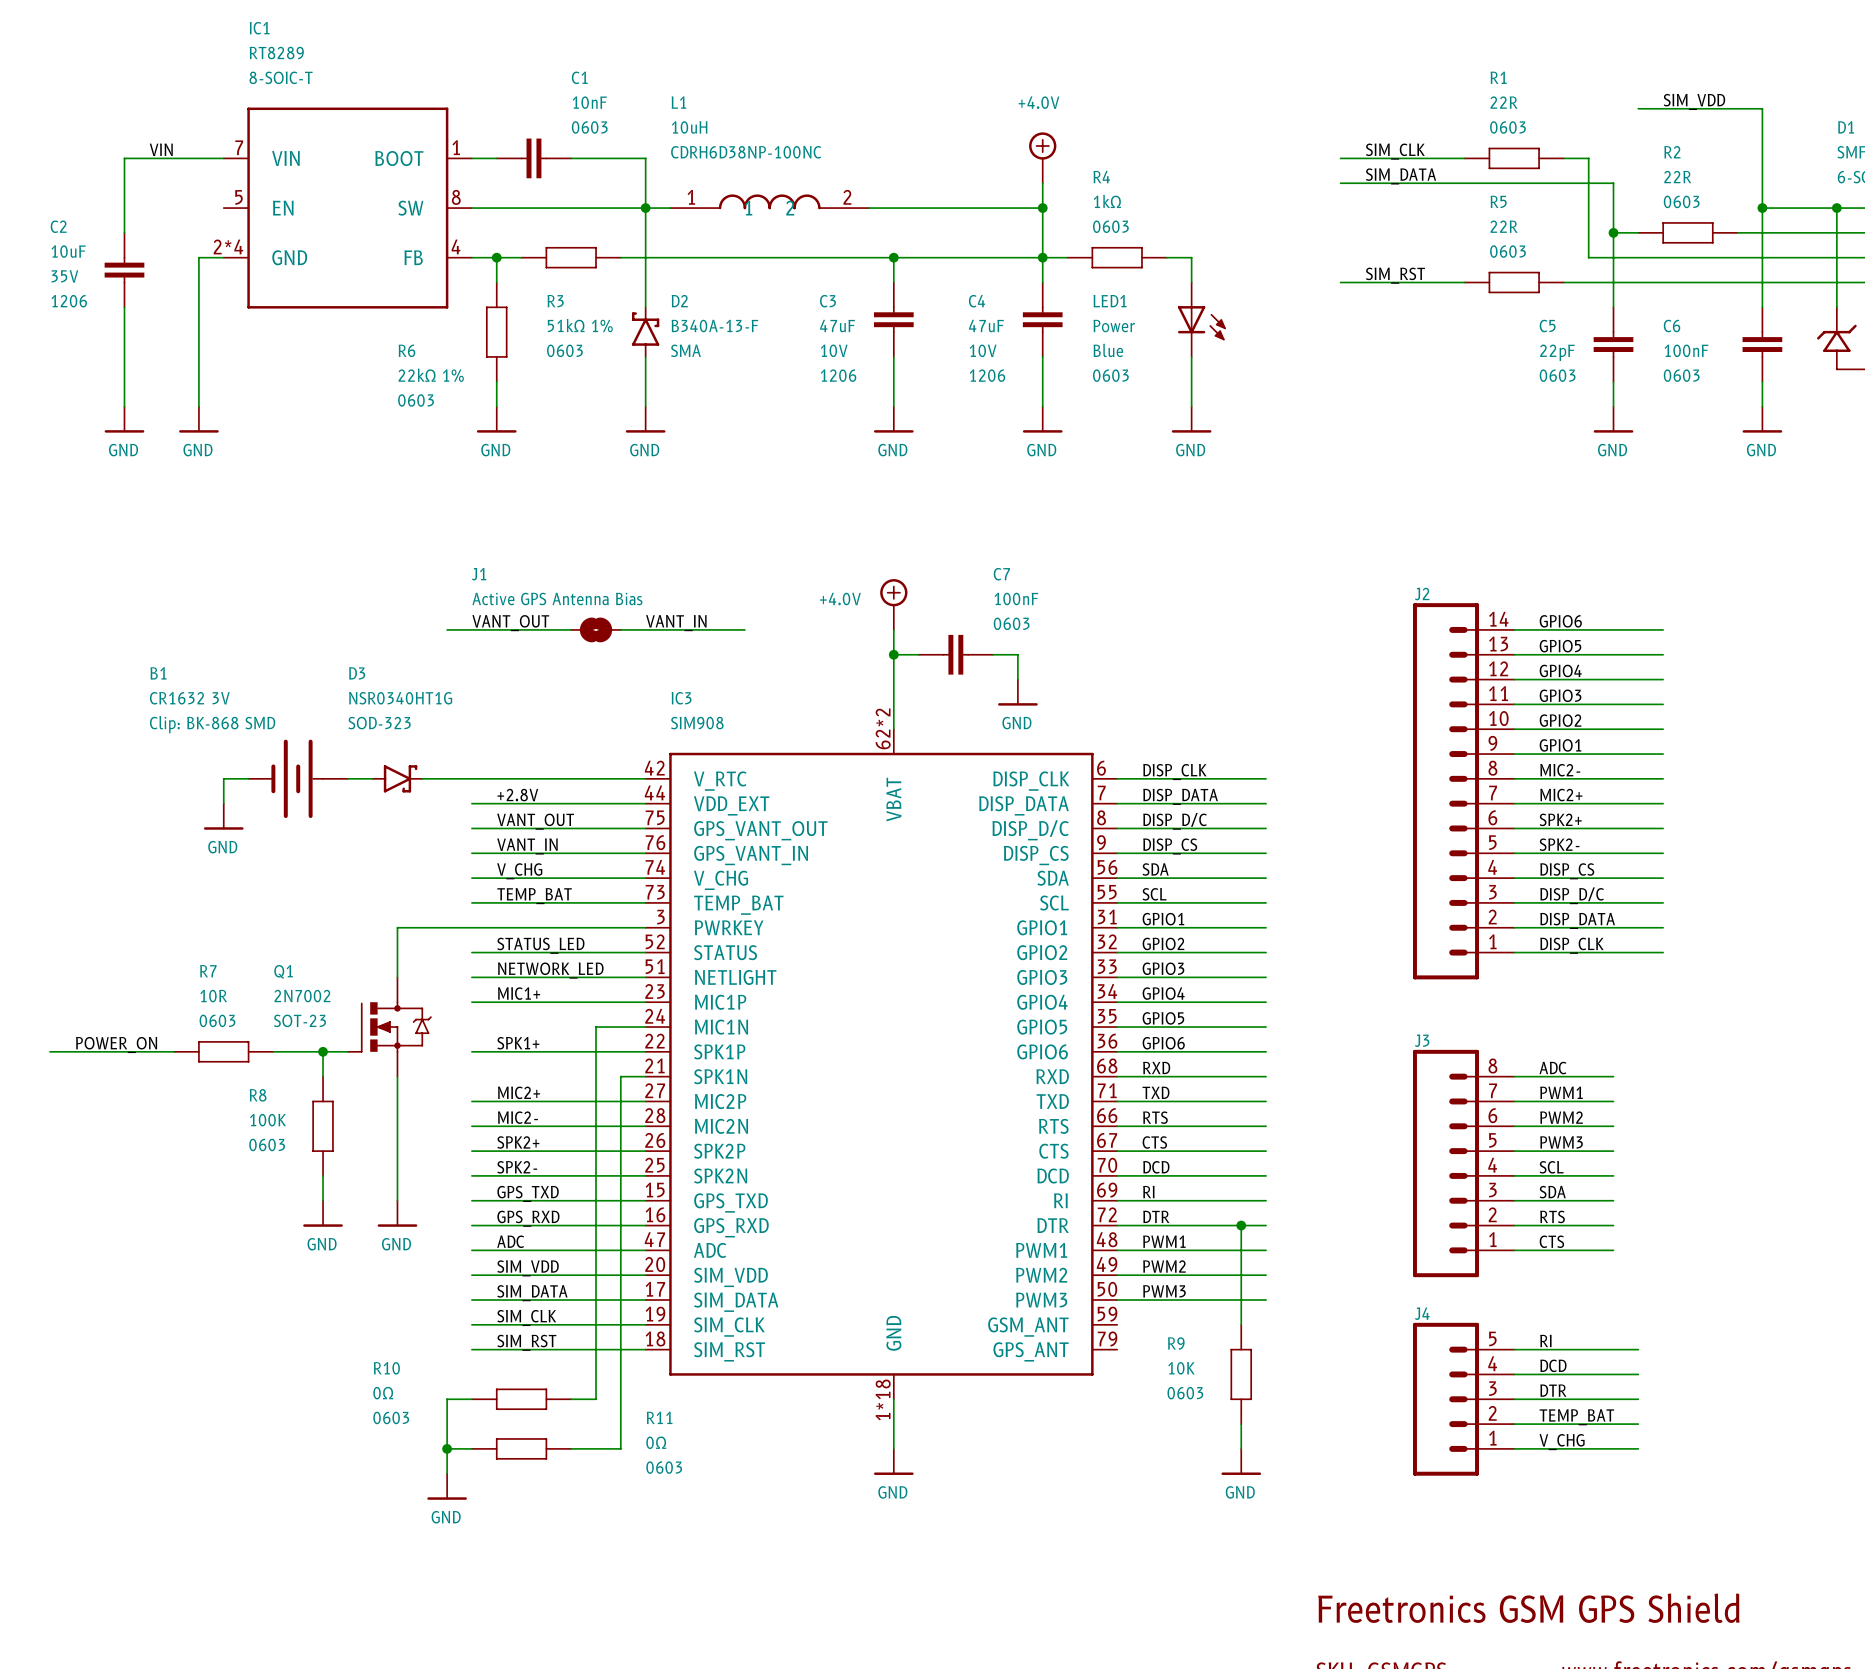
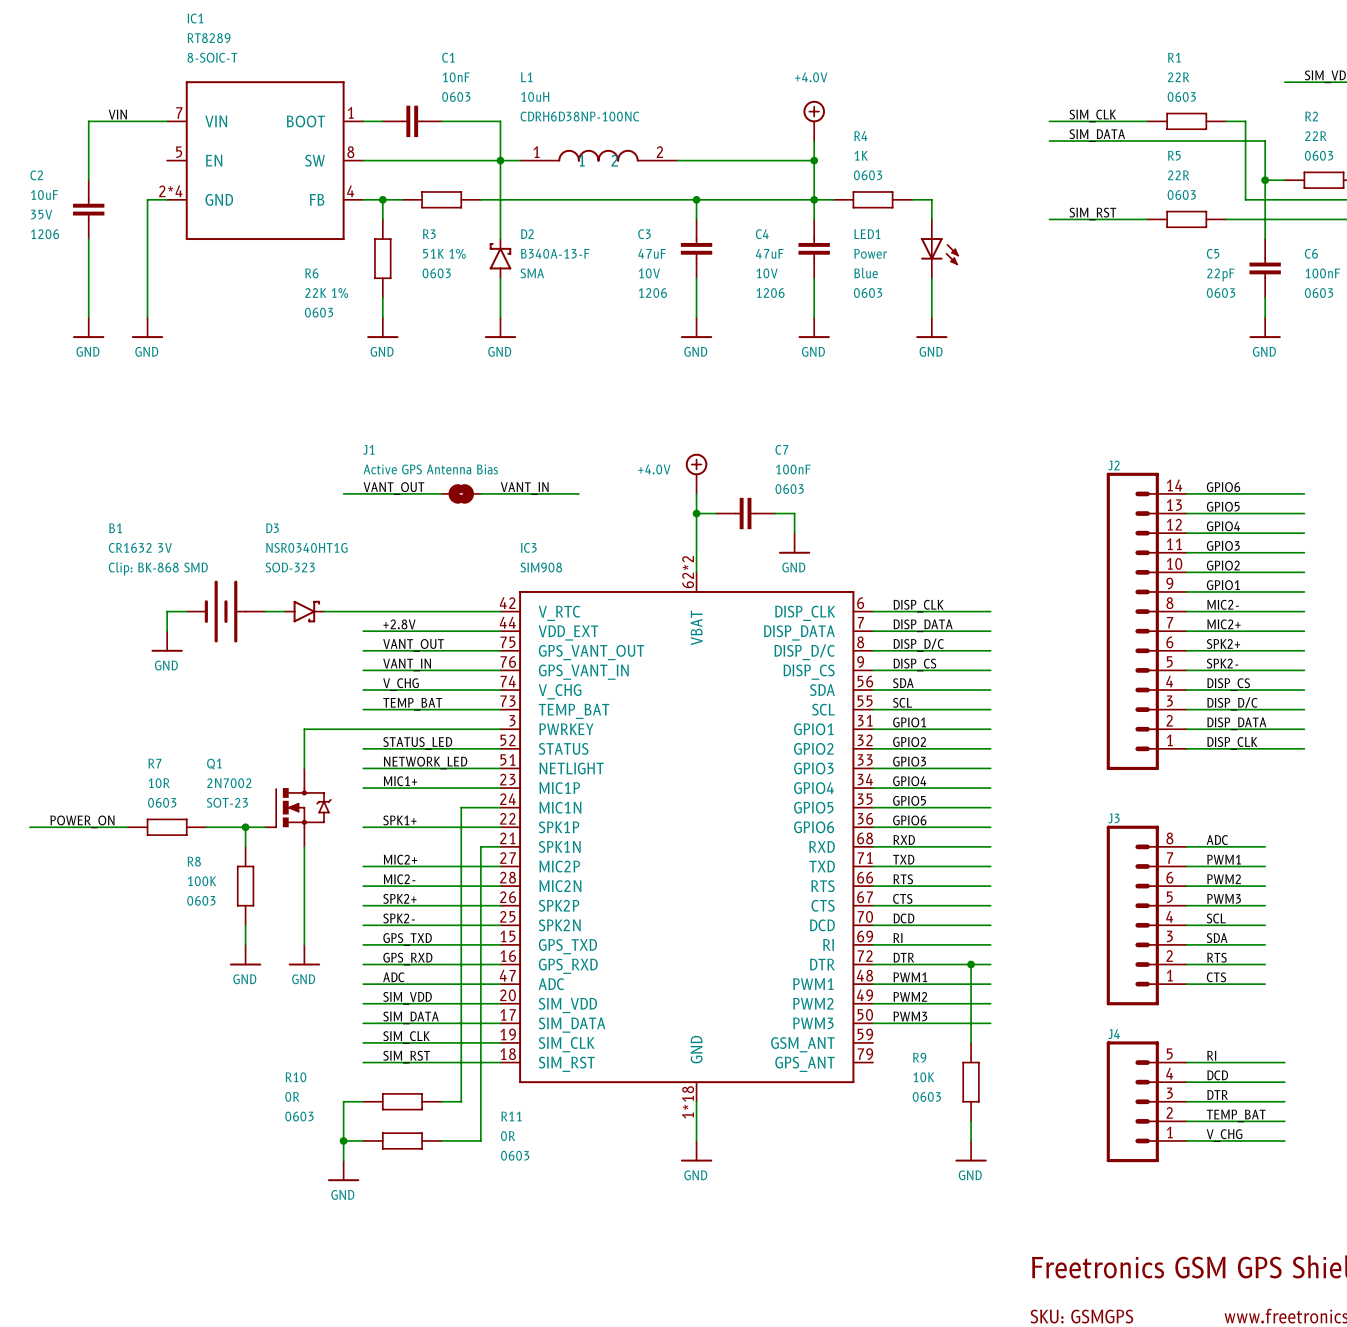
R4 value: 1kΩ (1107, 201) -> 1K (861, 155)
R3 value: 51kΩ 1% (580, 325) -> 51K 1% (444, 253)
R6 value: 22kΩ 1% (431, 375) -> 22K 1% (326, 293)
R10 value: 0Ω (383, 1393) -> 0R (292, 1096)
R11 value: 0Ω (656, 1442) -> 0R (508, 1136)

